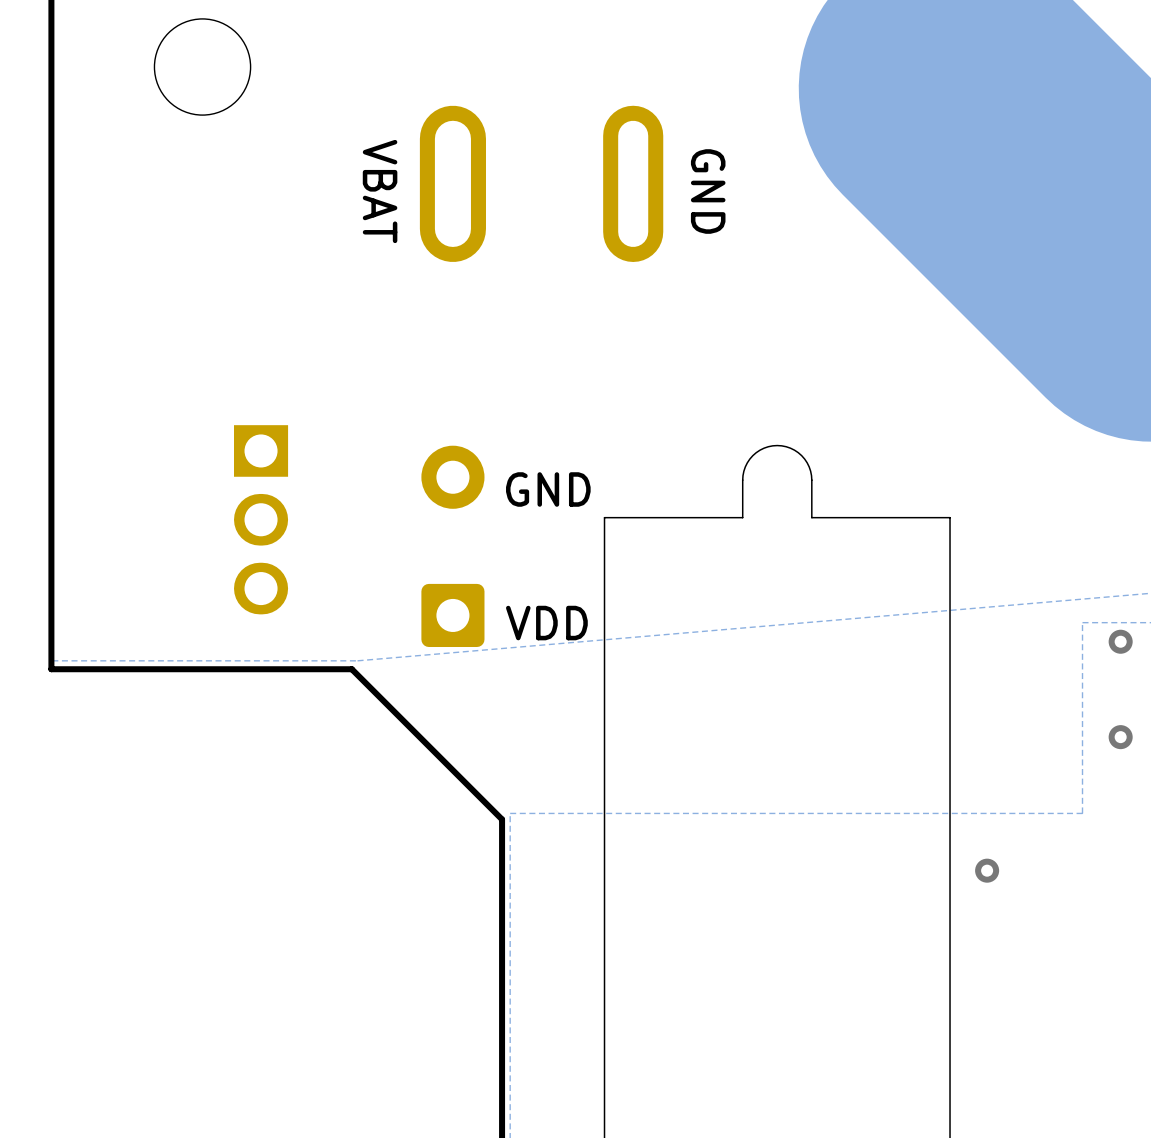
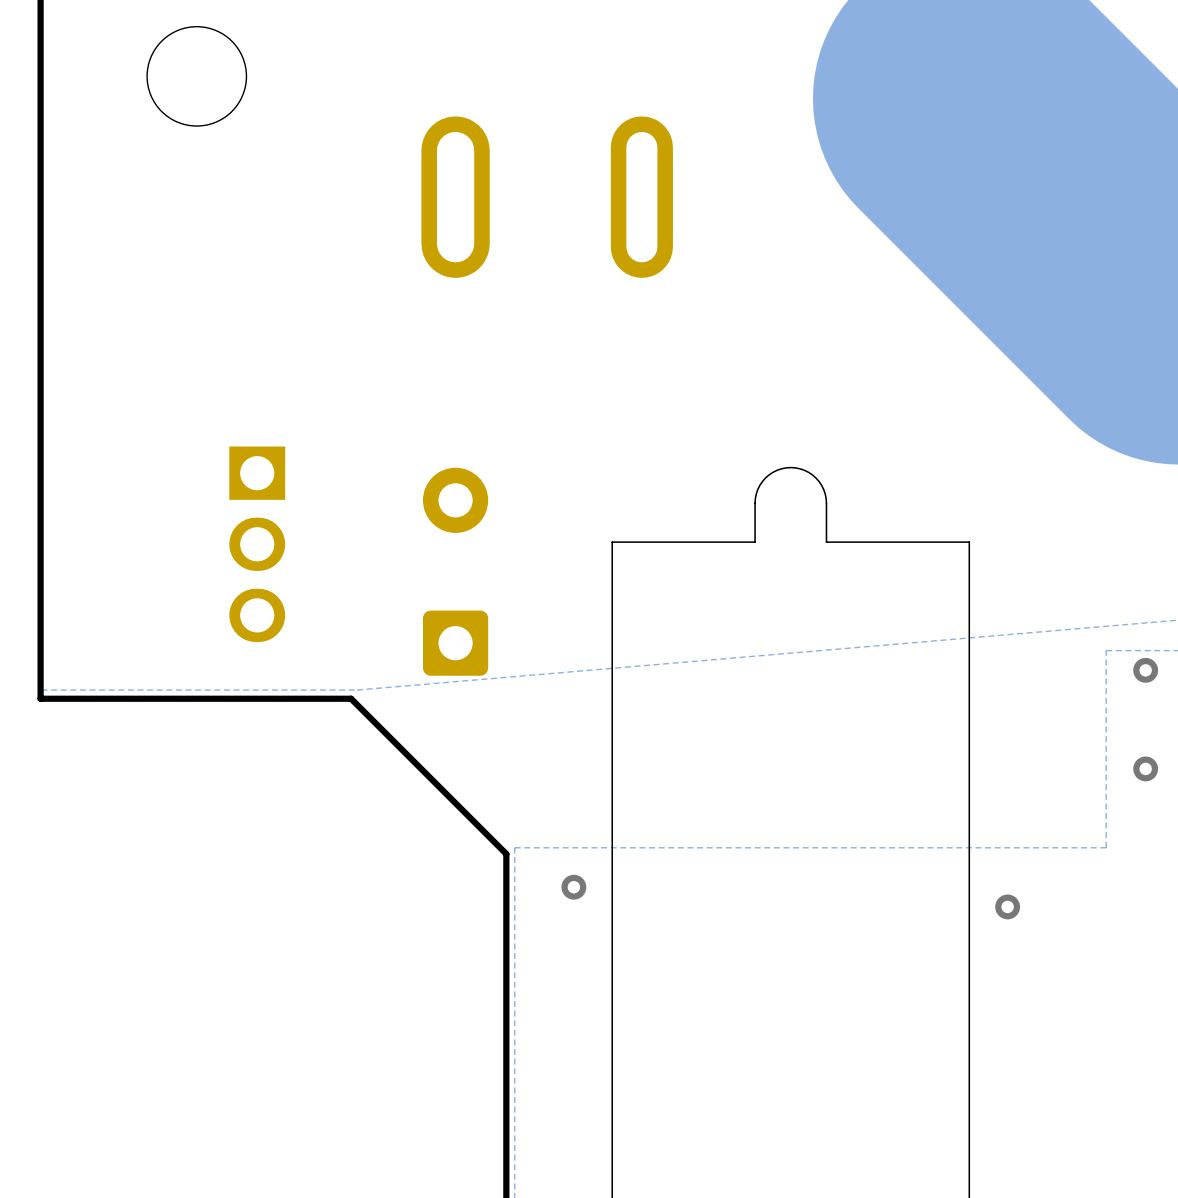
text: VBAT (380, 191) -> none
text: GND (708, 191) -> none
text: GND (548, 489) -> none
text: VDD (546, 623) -> none
via: none -> (573, 887)

